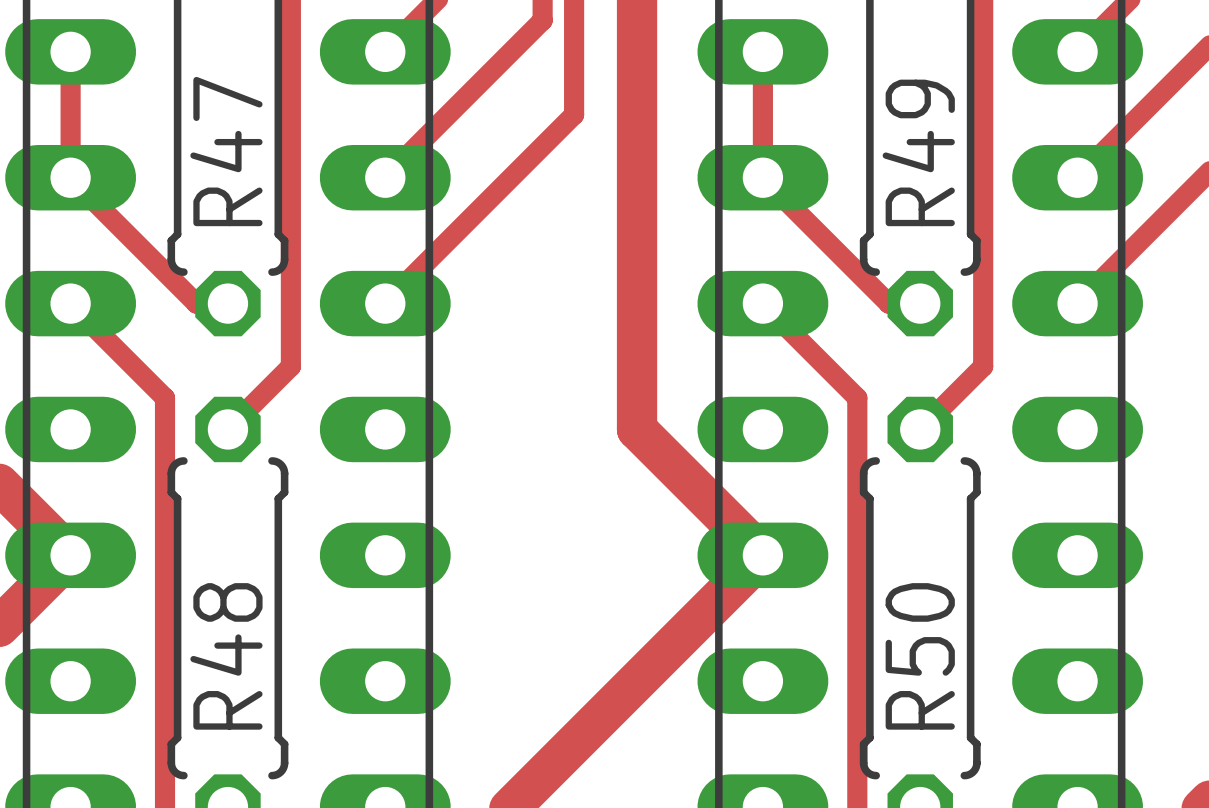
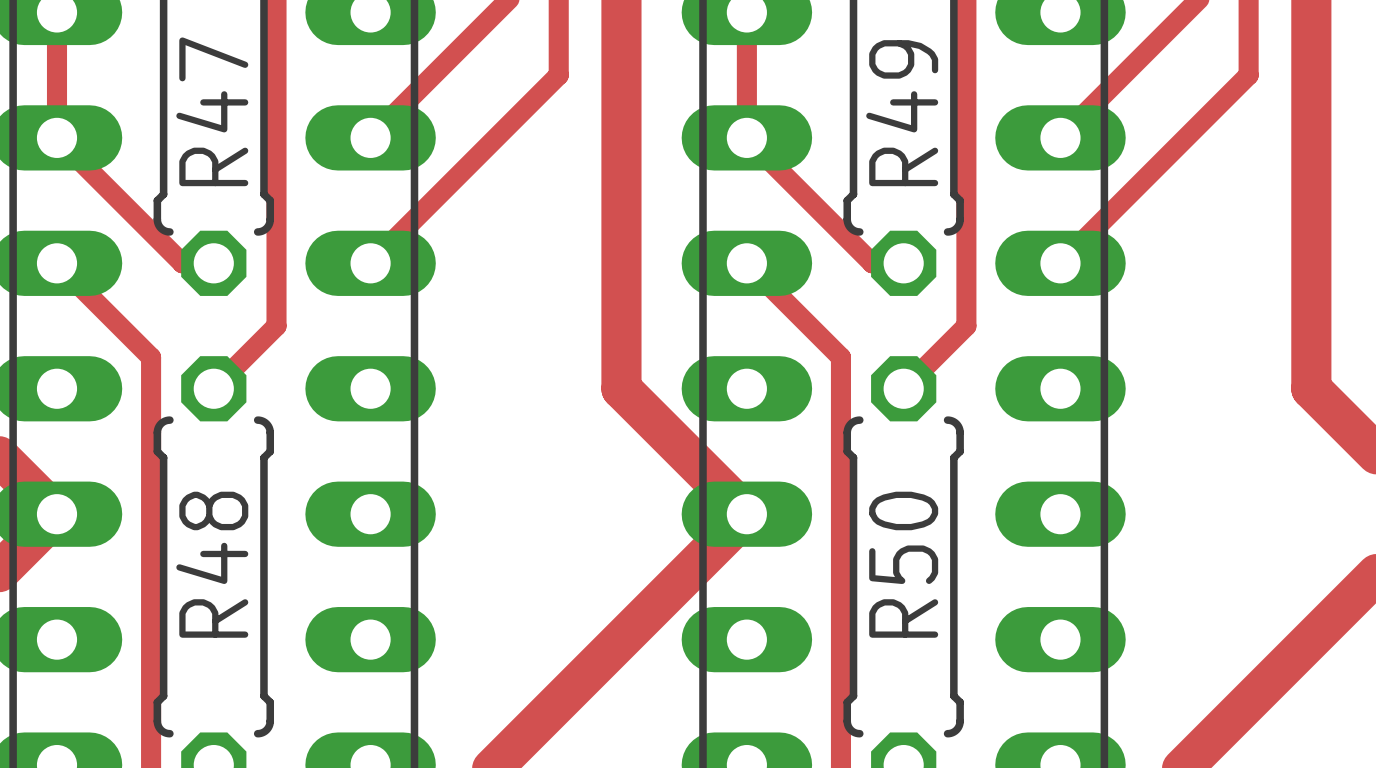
R48 name position: R48 (226, 656) -> R48 (212, 564)
R50 name position: R50 (920, 656) -> R50 (903, 564)

